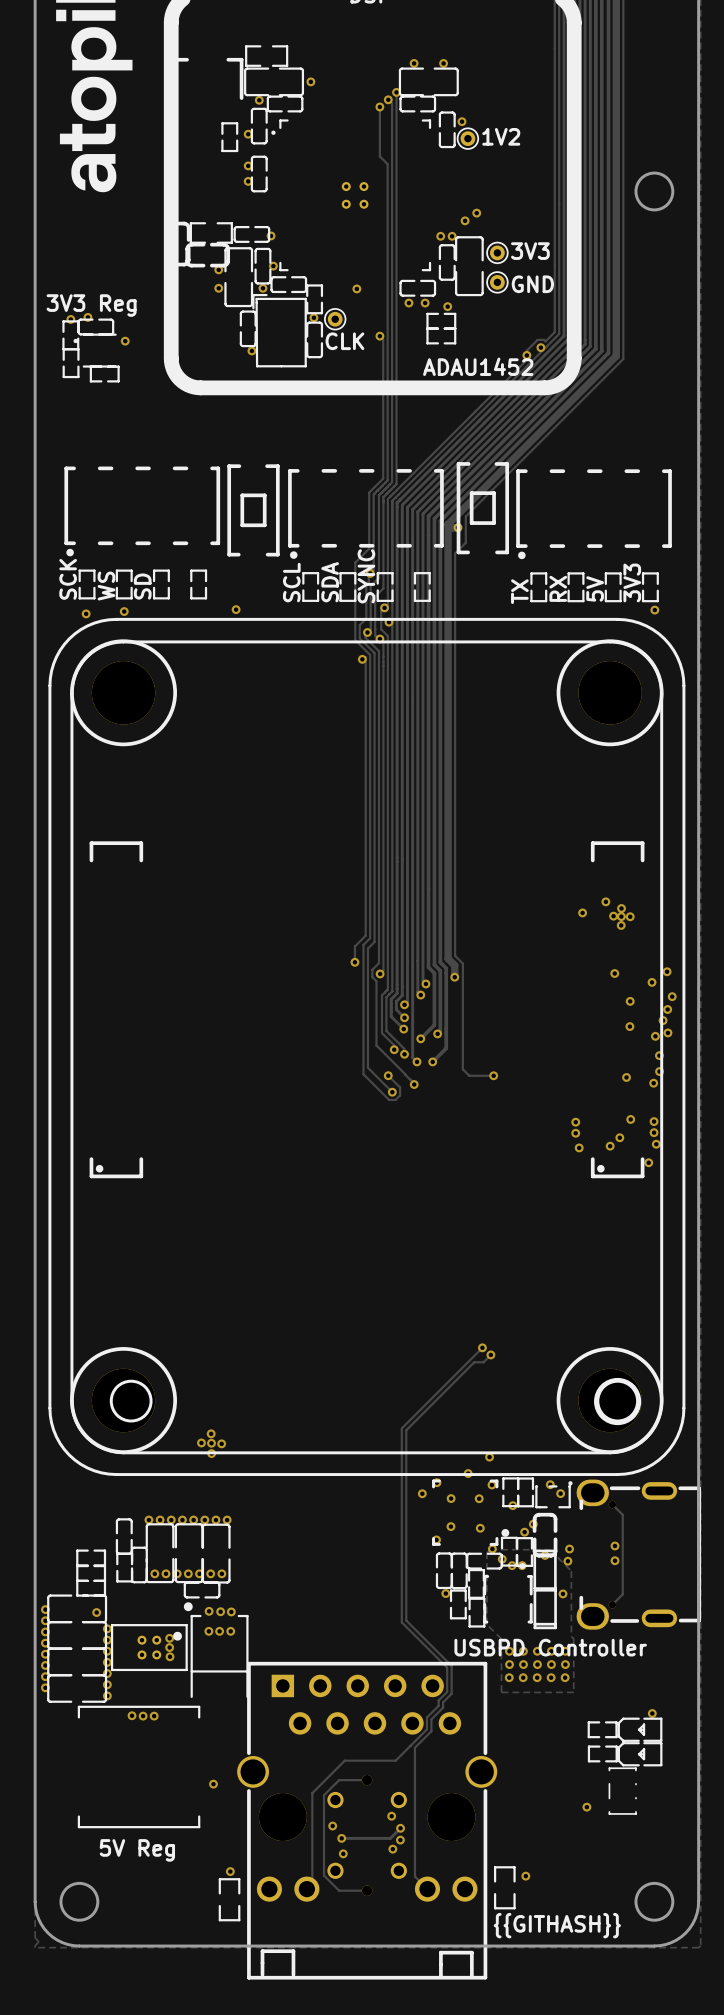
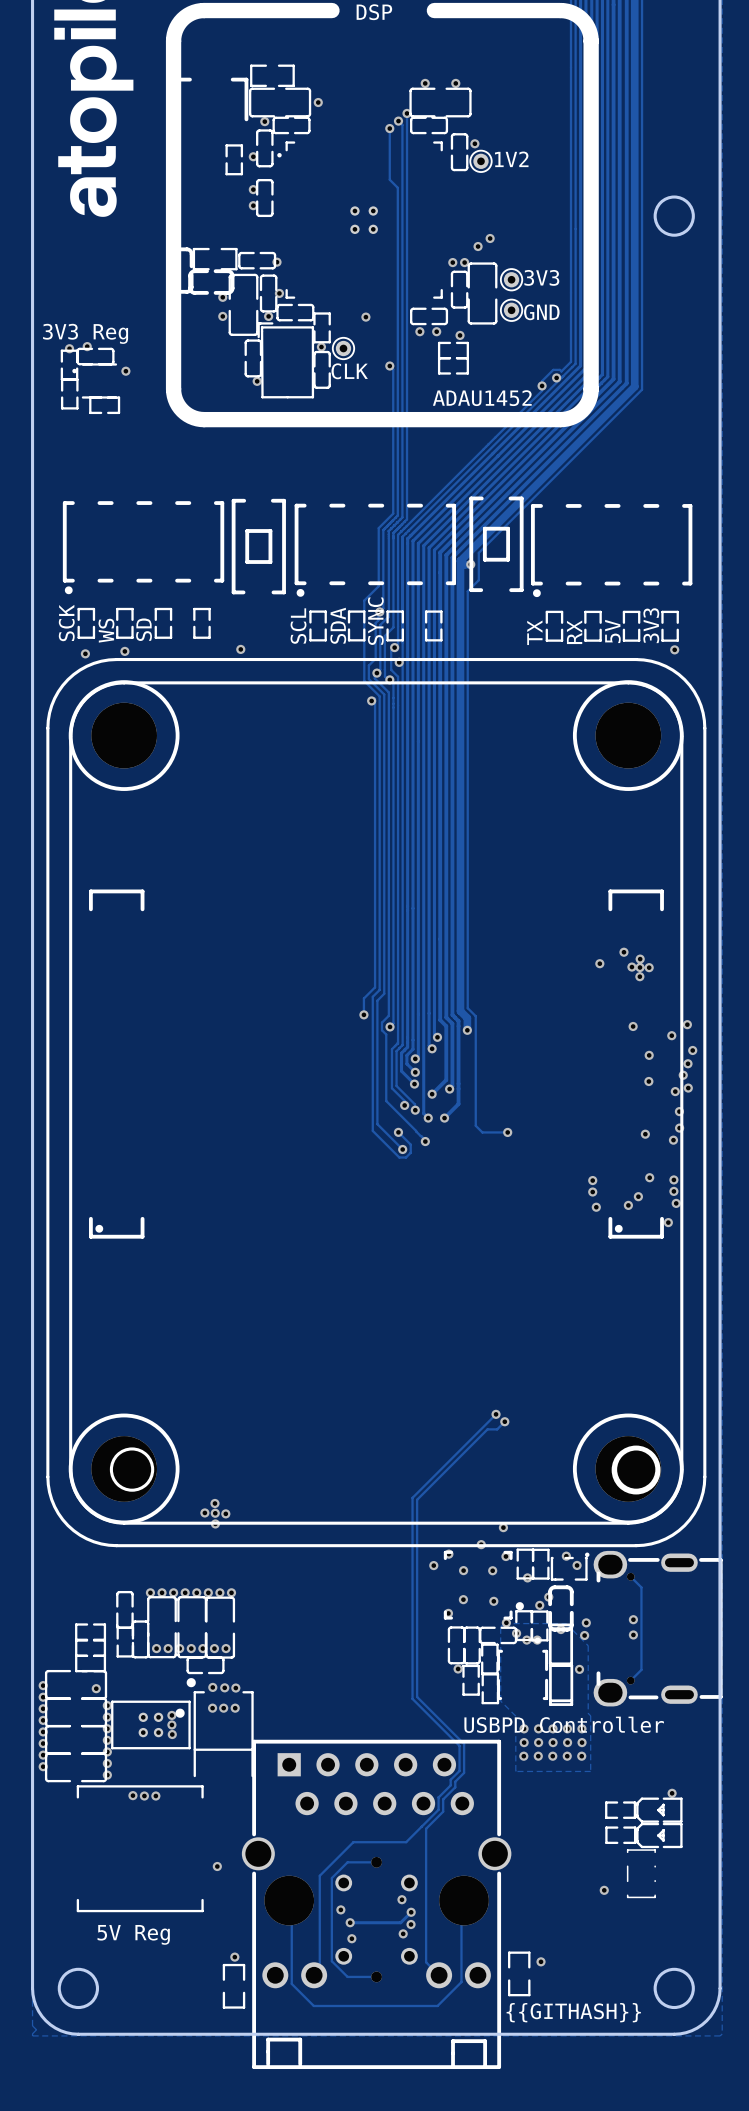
track: none -> (289, 1900) (291, 1903) (291, 1983) (313, 2005) (437, 2005) (461, 1982) (461, 1903) (464, 1900)

